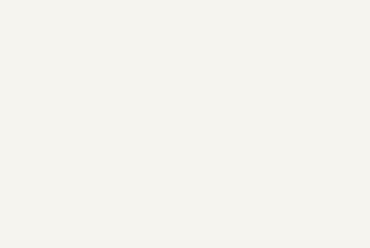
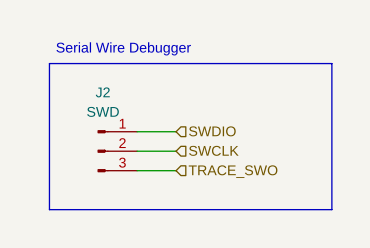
text: none -> Serial Wire Debugger (123, 48)
line: none -> (49, 63) (331, 63) (331, 209) (49, 209) (49, 63)
wire: none -> (137, 131) (176, 131)
hierarchical label: none -> SWDIO (212, 131)
hierarchical label: none -> SWCLK (213, 150)
J2: none -> SWD (117, 151)
wire: none -> (137, 151) (176, 151)
wire: none -> (137, 170) (176, 170)
hierarchical label: none -> TRACE_SWO (233, 171)

